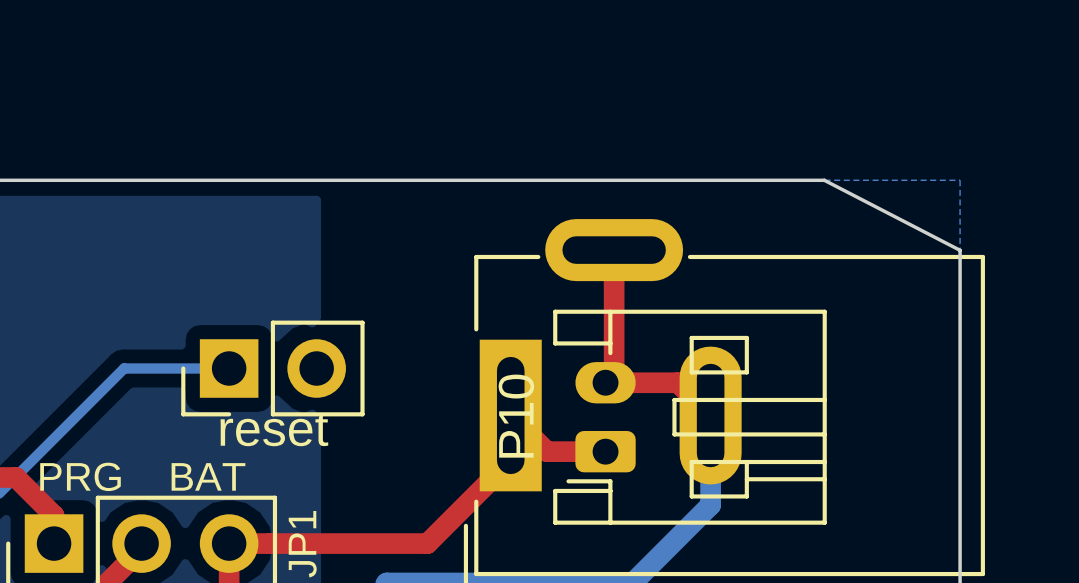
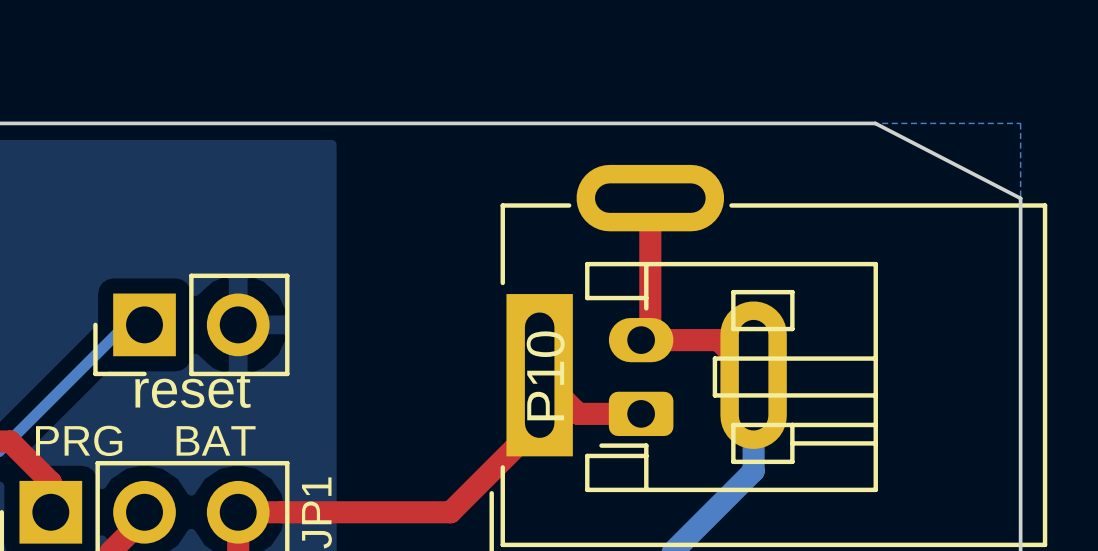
bottom track: (141, 368) (229, 368) -> none
part position: (272, 368) -> (191, 324)

